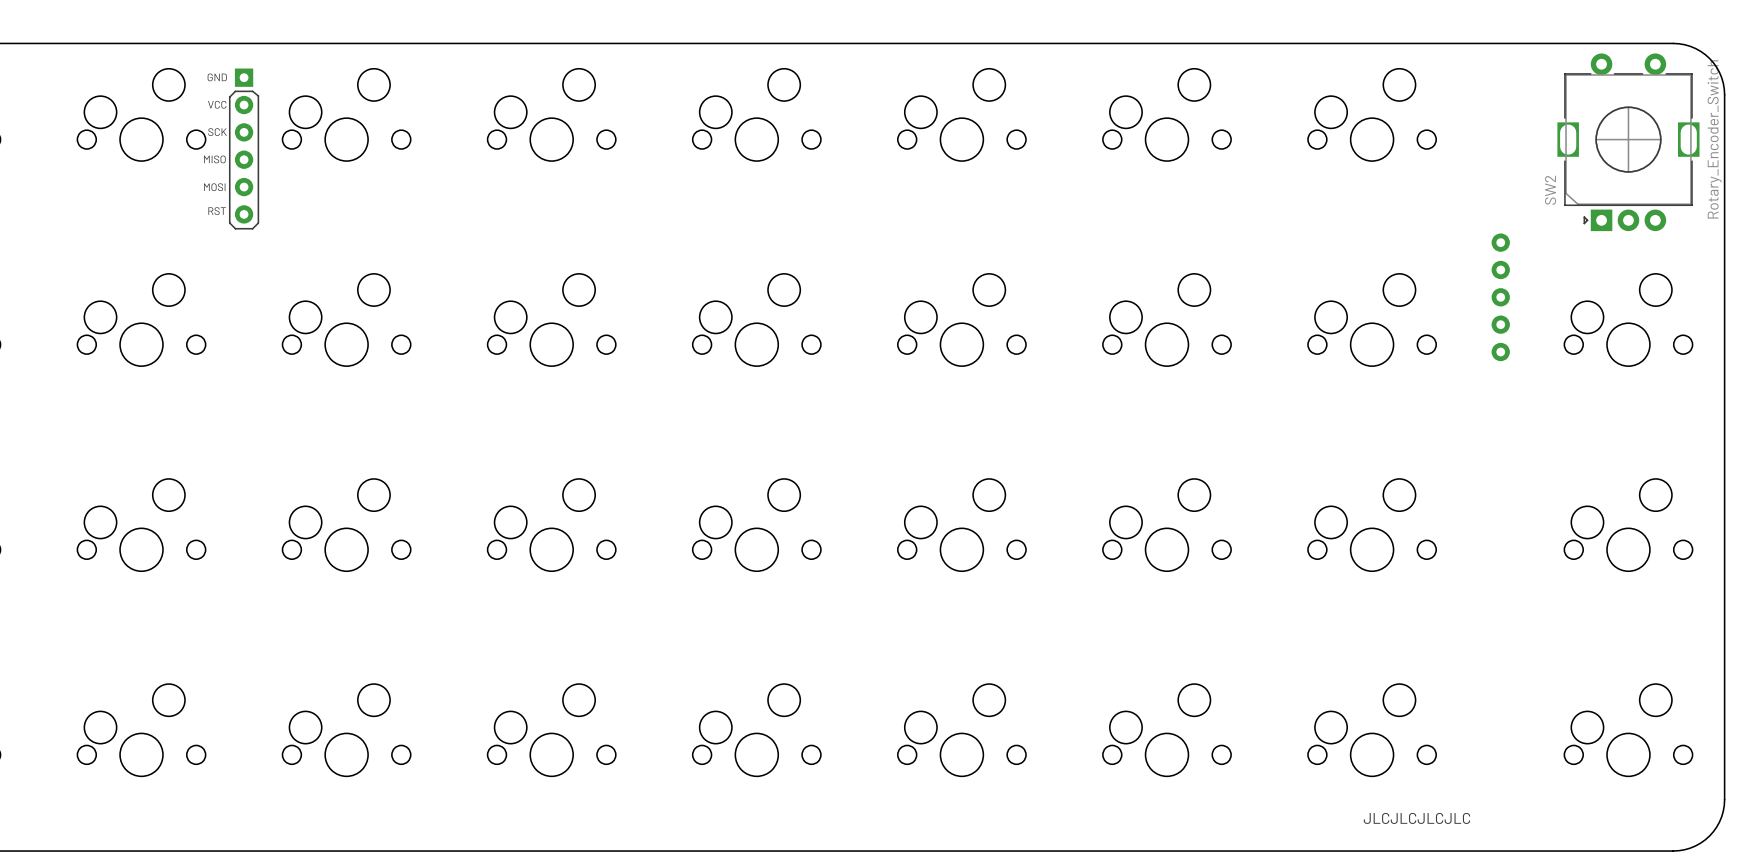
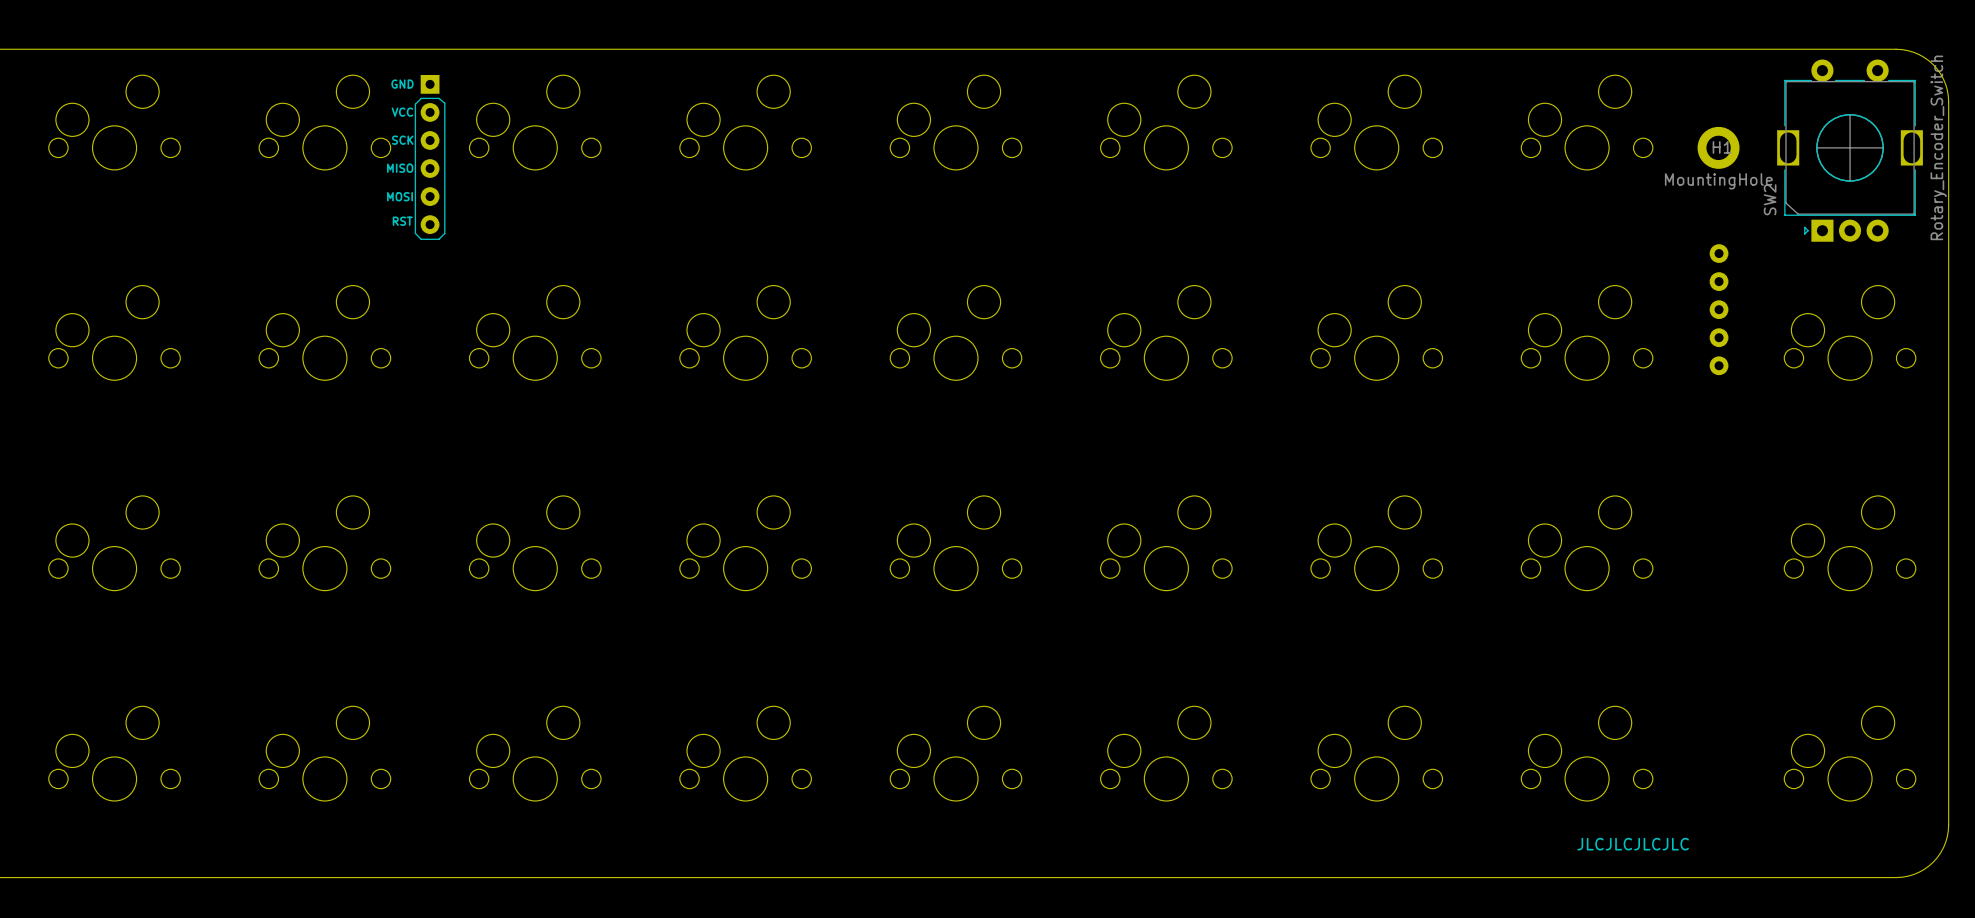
H1: none -> MountingHole (1718, 147)

